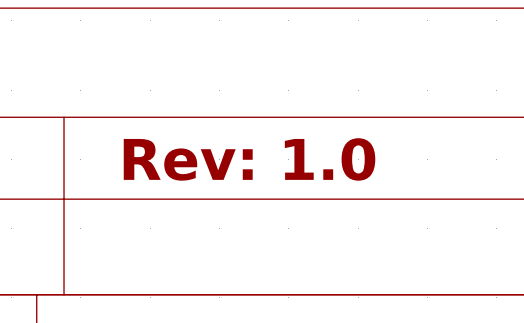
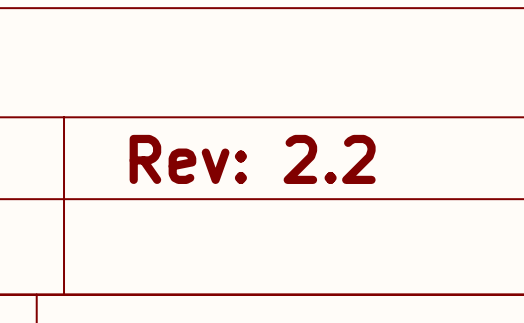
title block: Rev: 1.0 (249, 159) -> Rev: 2.2 (252, 159)

